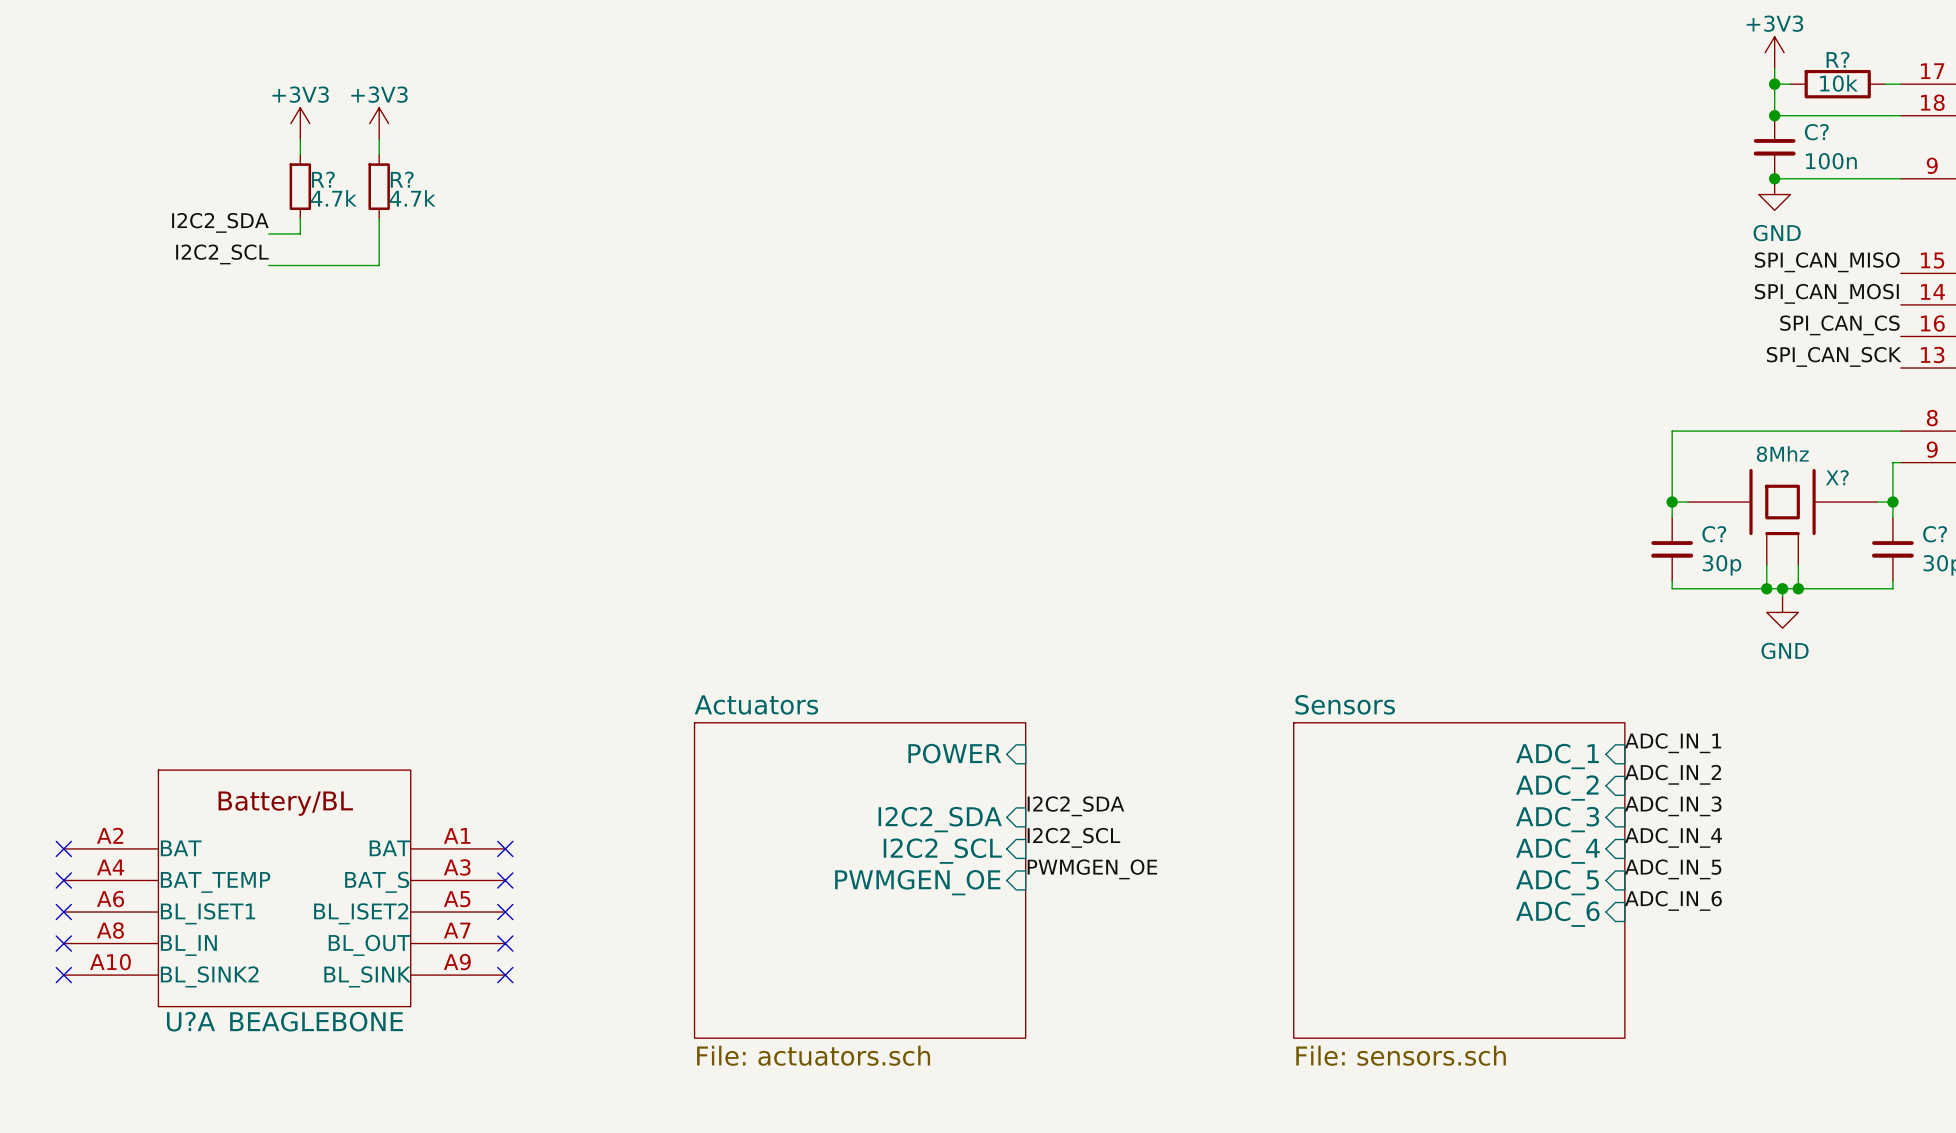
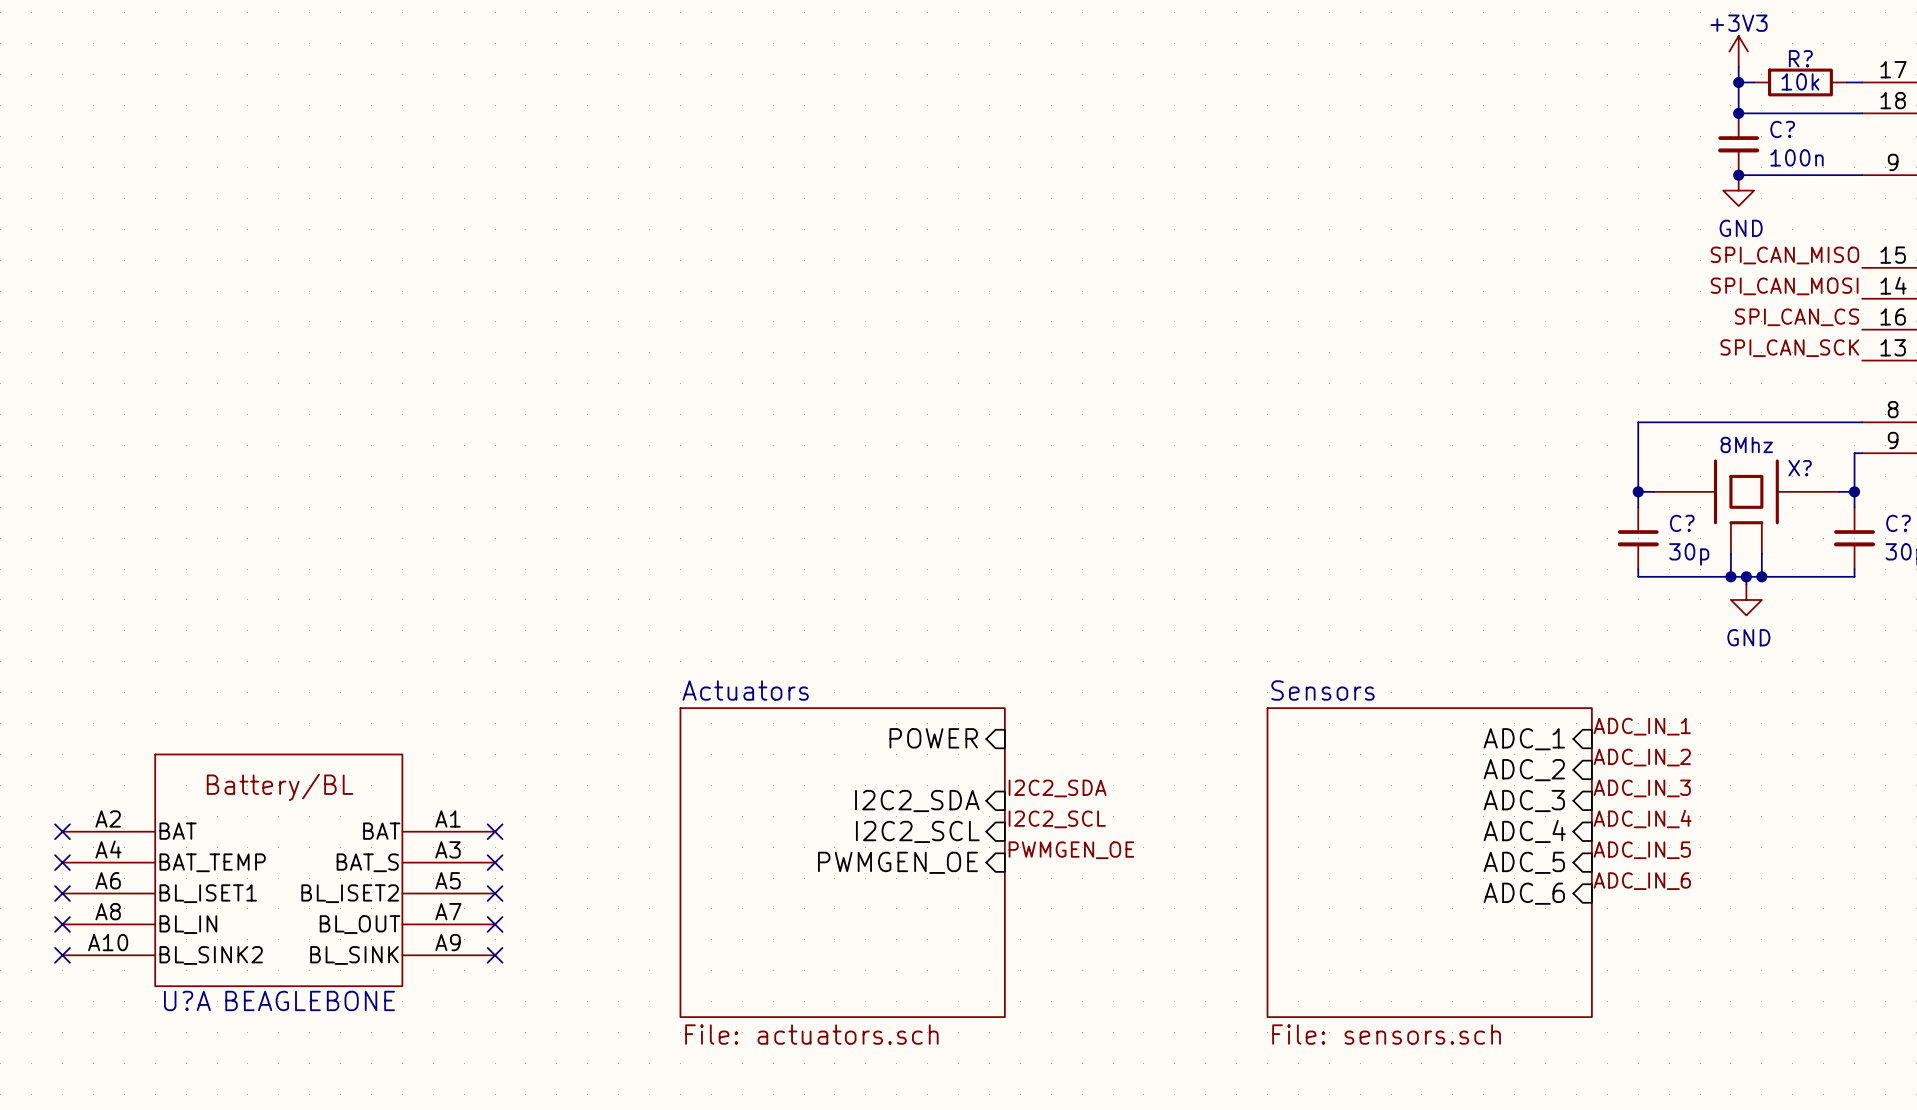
power symbol: +3V3 (300, 123) -> none
power symbol: +3V3 (379, 123) -> none
wire: (300, 139) (300, 155) -> none
wire: (379, 139) (379, 155) -> none
R?: 4.7k (300, 186) -> none
R?: 4.7k (379, 186) -> none
wire: (300, 218) (300, 233) (268, 233) -> none
wire: (379, 218) (379, 265) (268, 265) -> none
label: I2C2_SDA (220, 222) -> none
label: I2C2_SCL (222, 254) -> none

